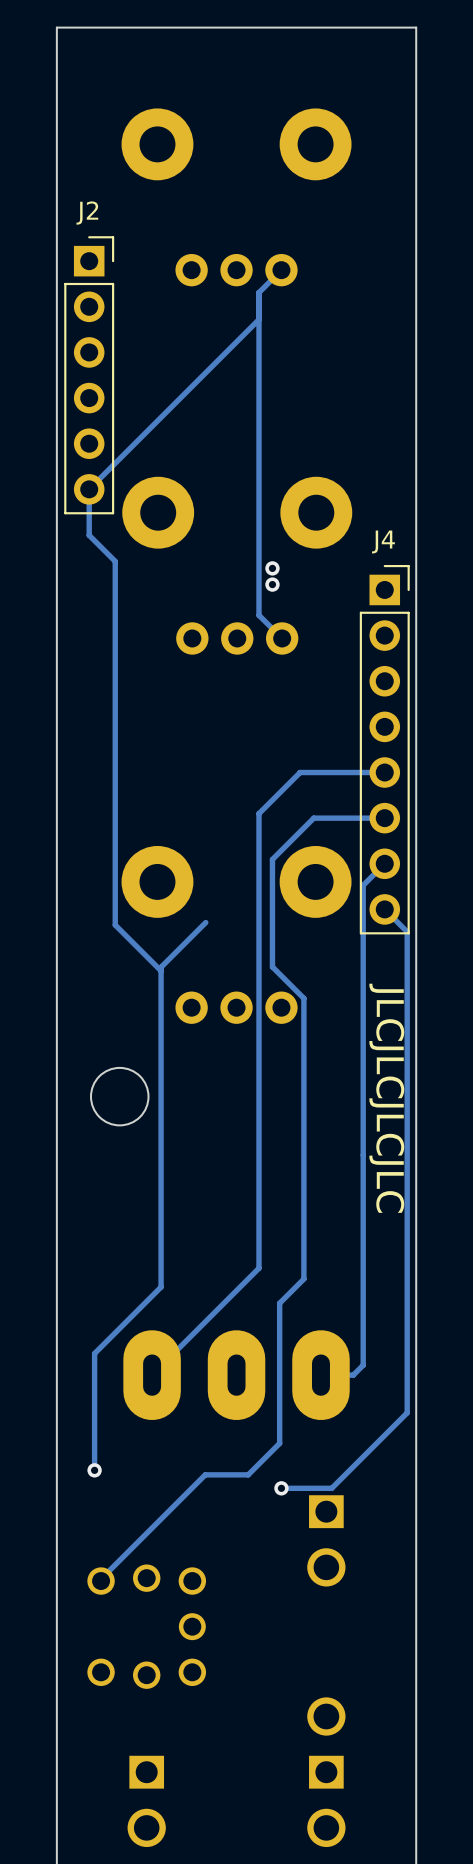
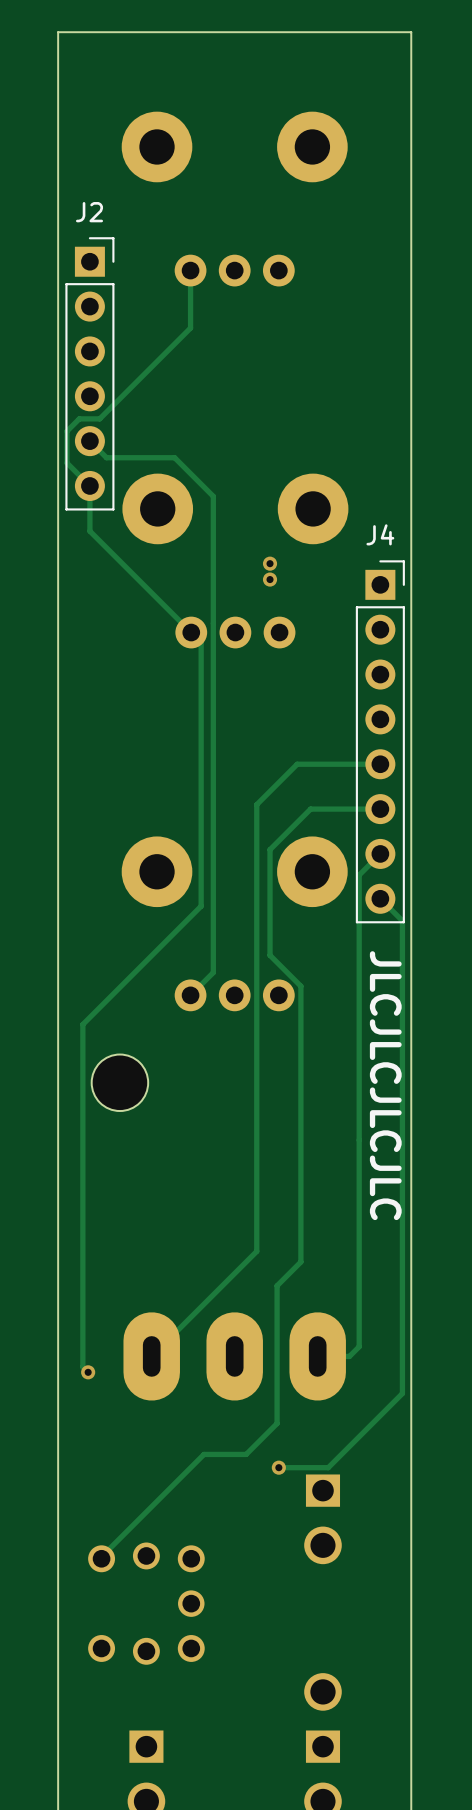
track: (281, 270) (258, 292) (258, 615) (282, 638) -> none
track: (258, 319) (89, 489) -> (190, 270) (190, 328) (99, 418) (79, 418) (66, 431) (66, 463) (89, 485)
track: none -> (89, 441) (106, 457) (174, 457) (213, 496) (213, 972) (190, 995)
track: (115, 561) (115, 925) (161, 970) -> (115, 556) (201, 642) (201, 906) (82, 1024) (82, 1367) (88, 1372)
track: (205, 922) (161, 967) (161, 1287) (94, 1353) (94, 1470) -> none
via position: (94, 1470) -> (88, 1372)

